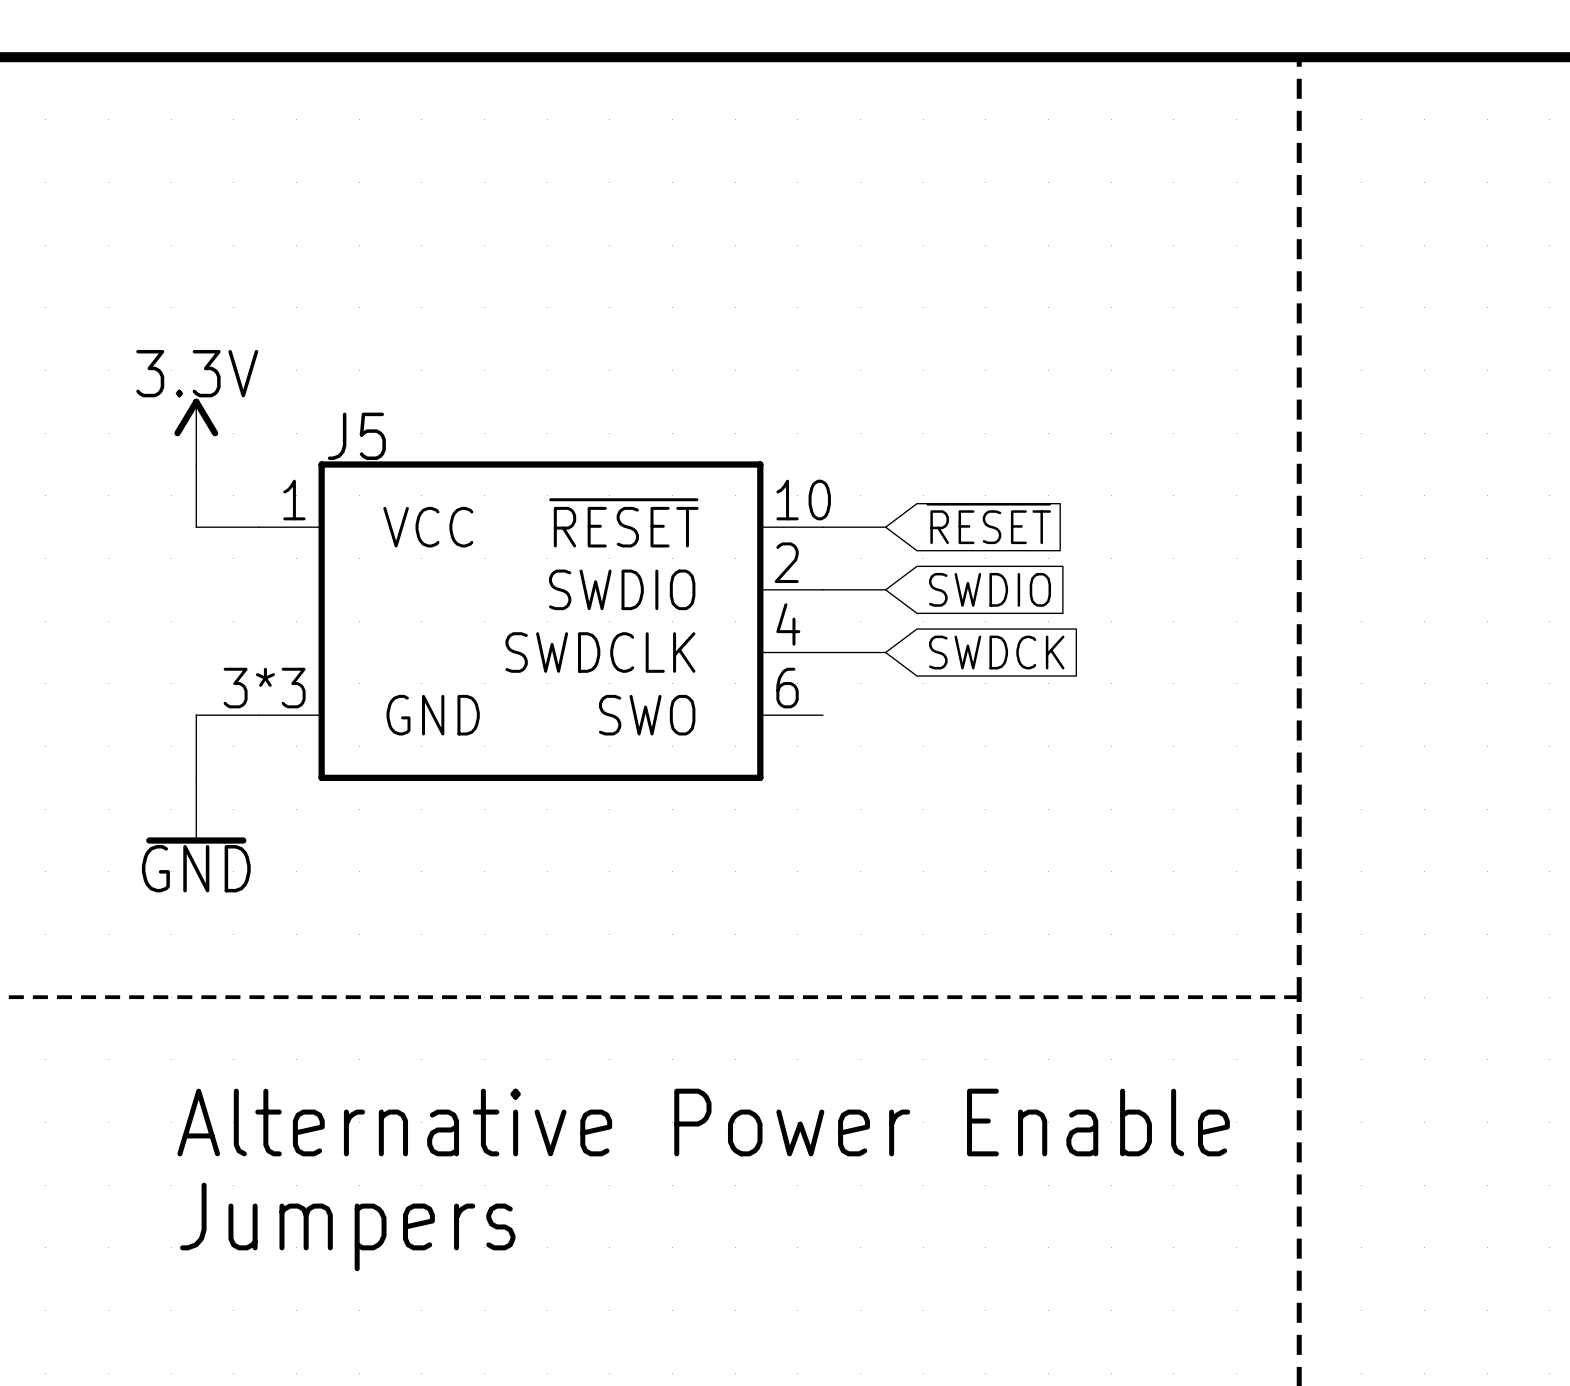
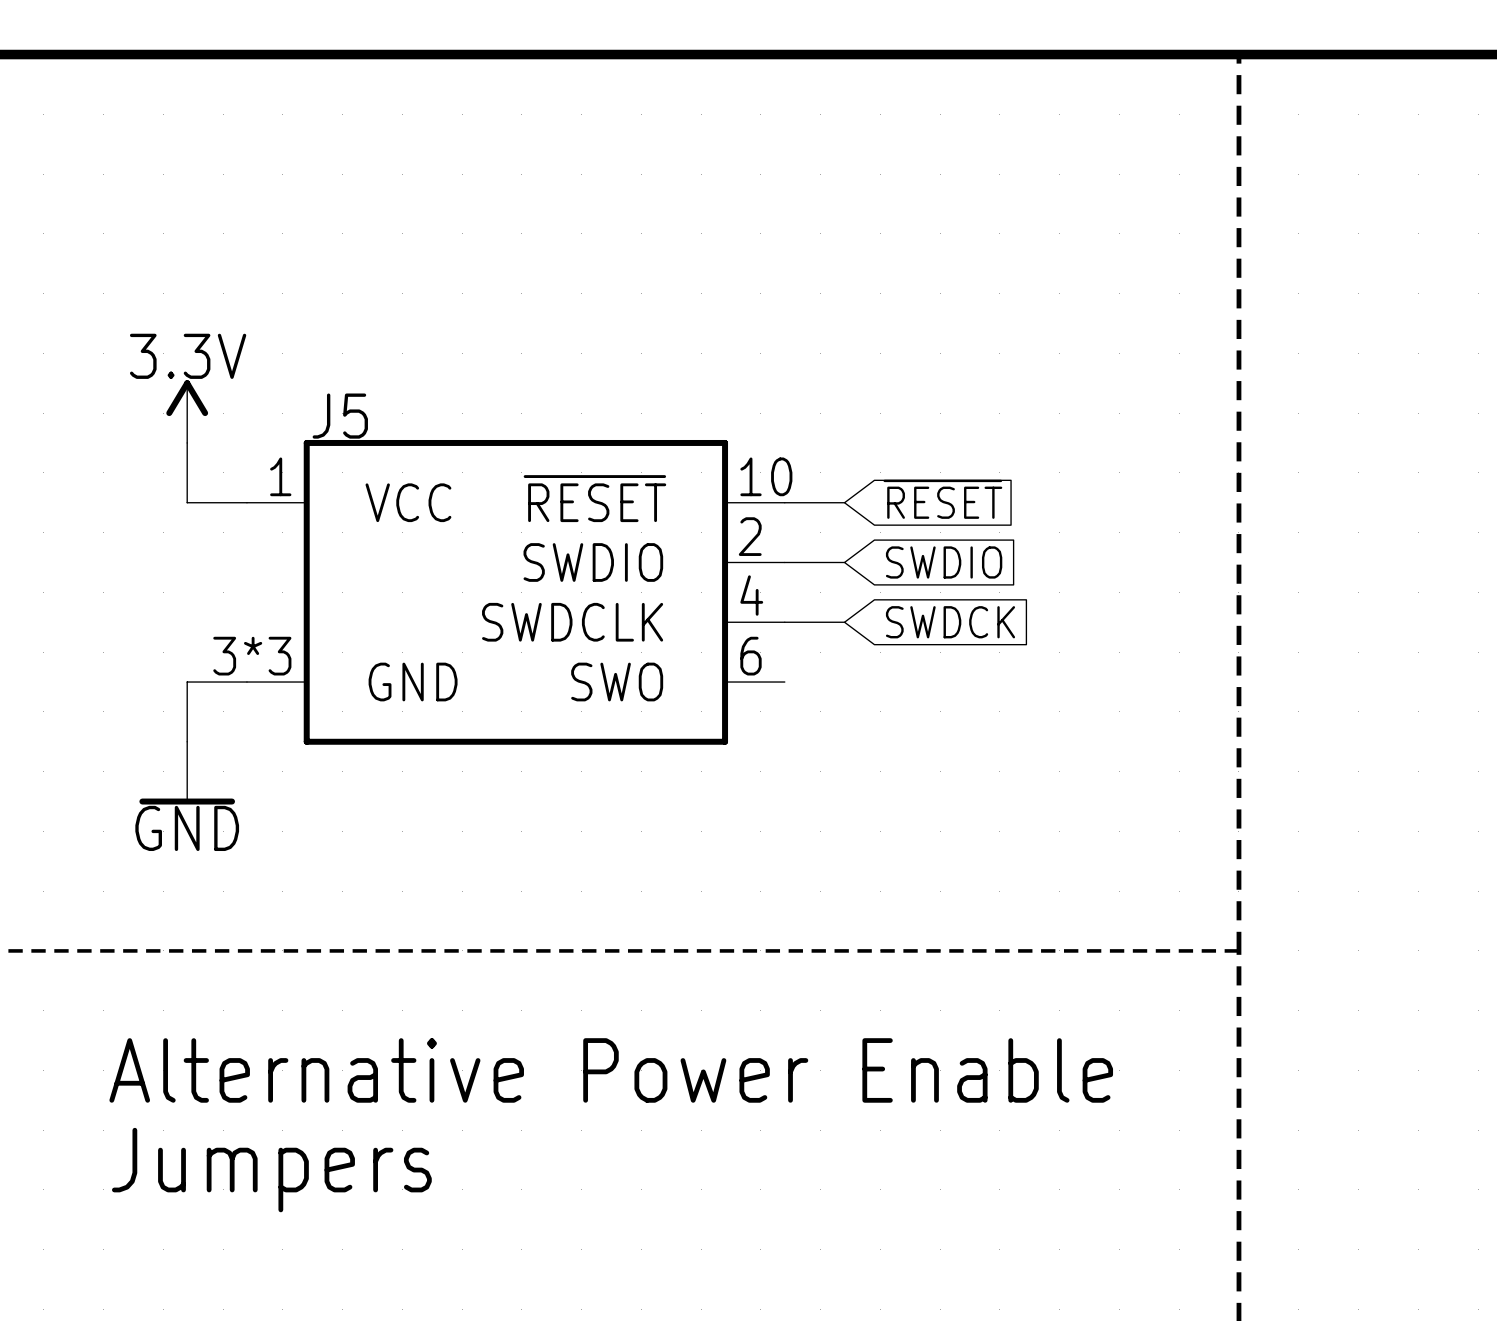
text position: Alternative Power Enable (703, 1122) -> Alternative Power Enable (611, 1070)
text position: Jumpers (347, 1226) -> Jumpers (271, 1170)

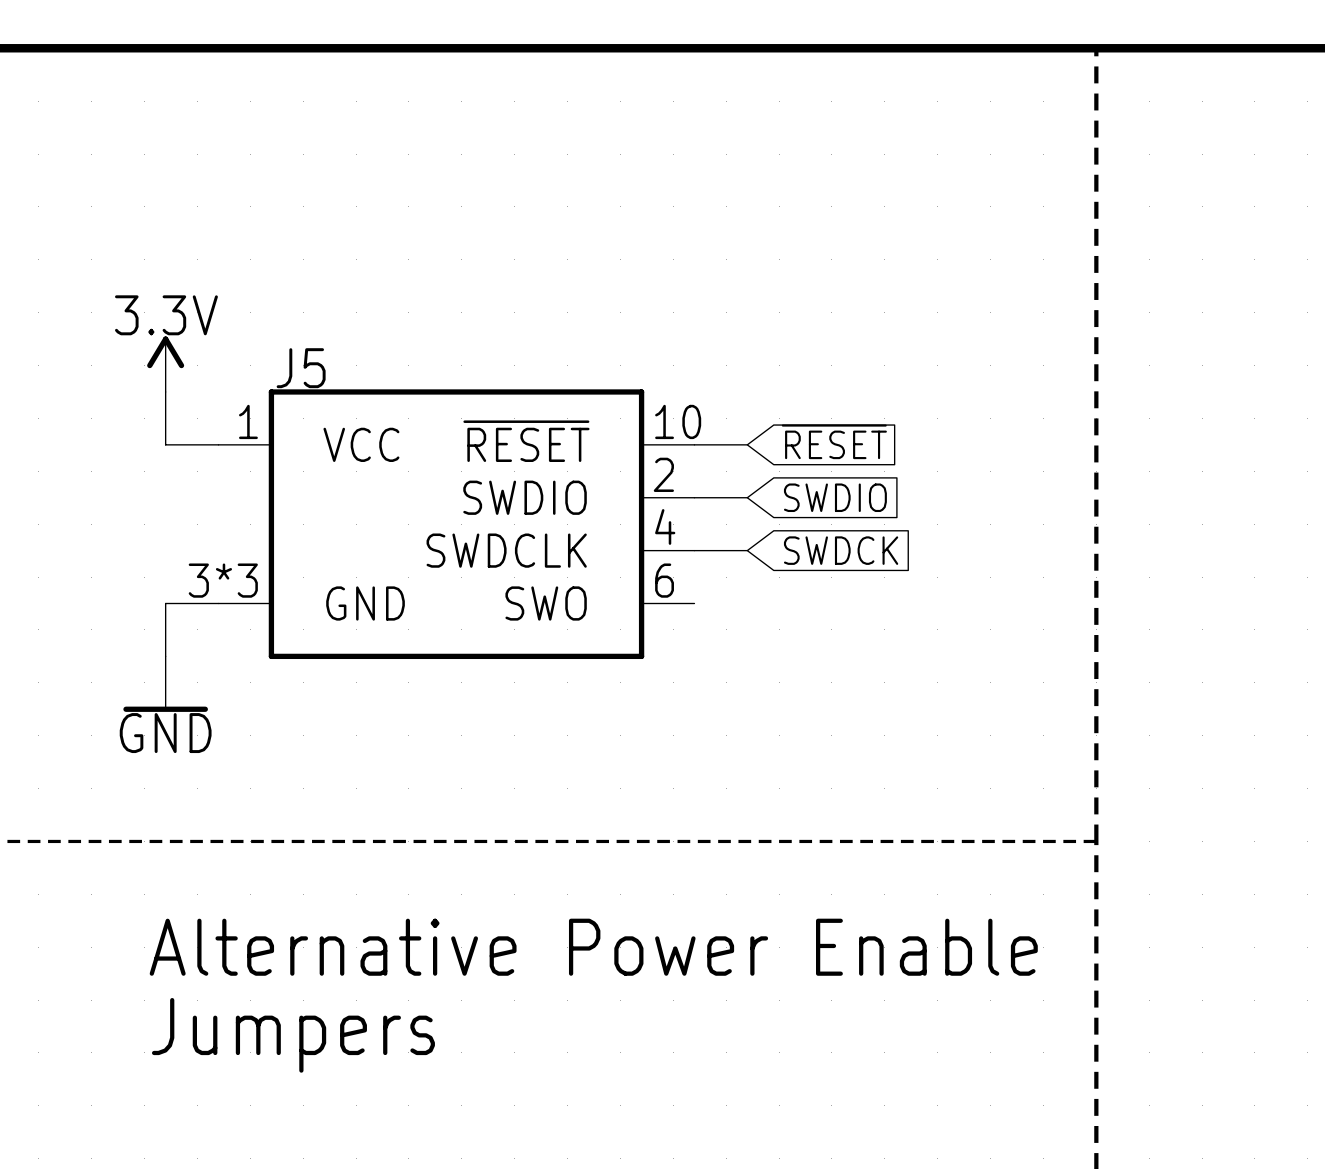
text position: Alternative Power Enable (611, 1070) -> Alternative Power Enable (593, 947)
text position: Jumpers (271, 1170) -> Jumpers (293, 1035)

